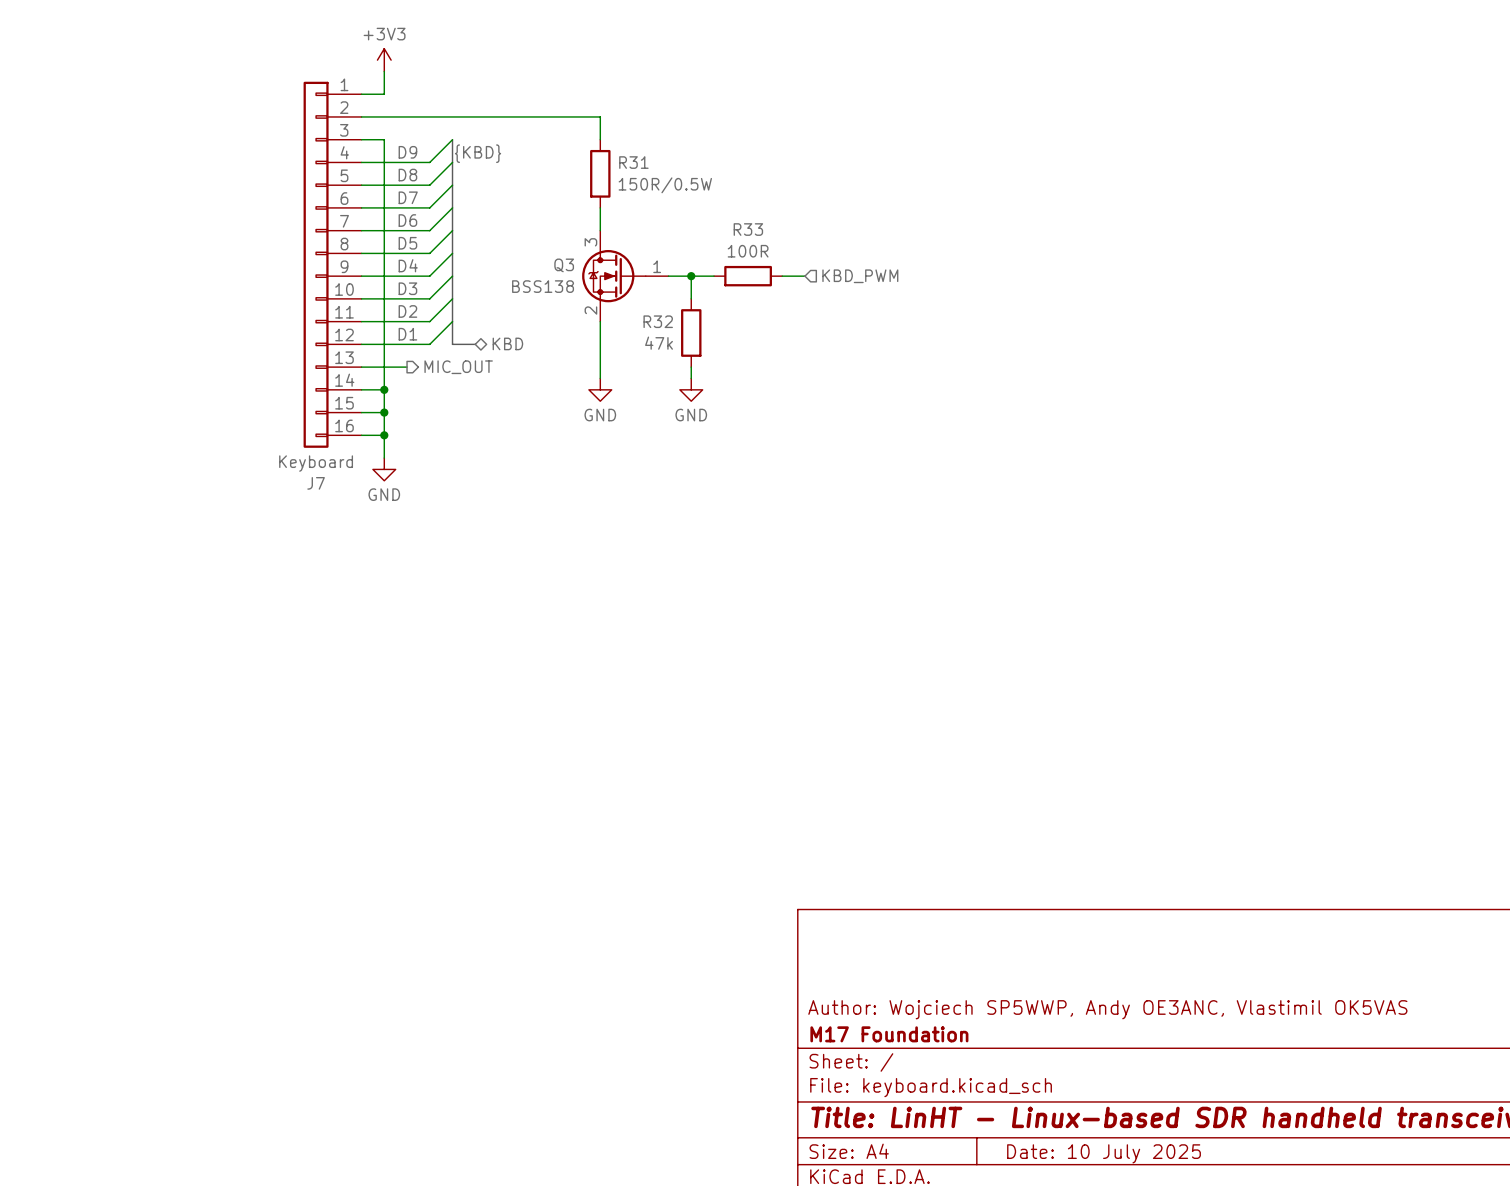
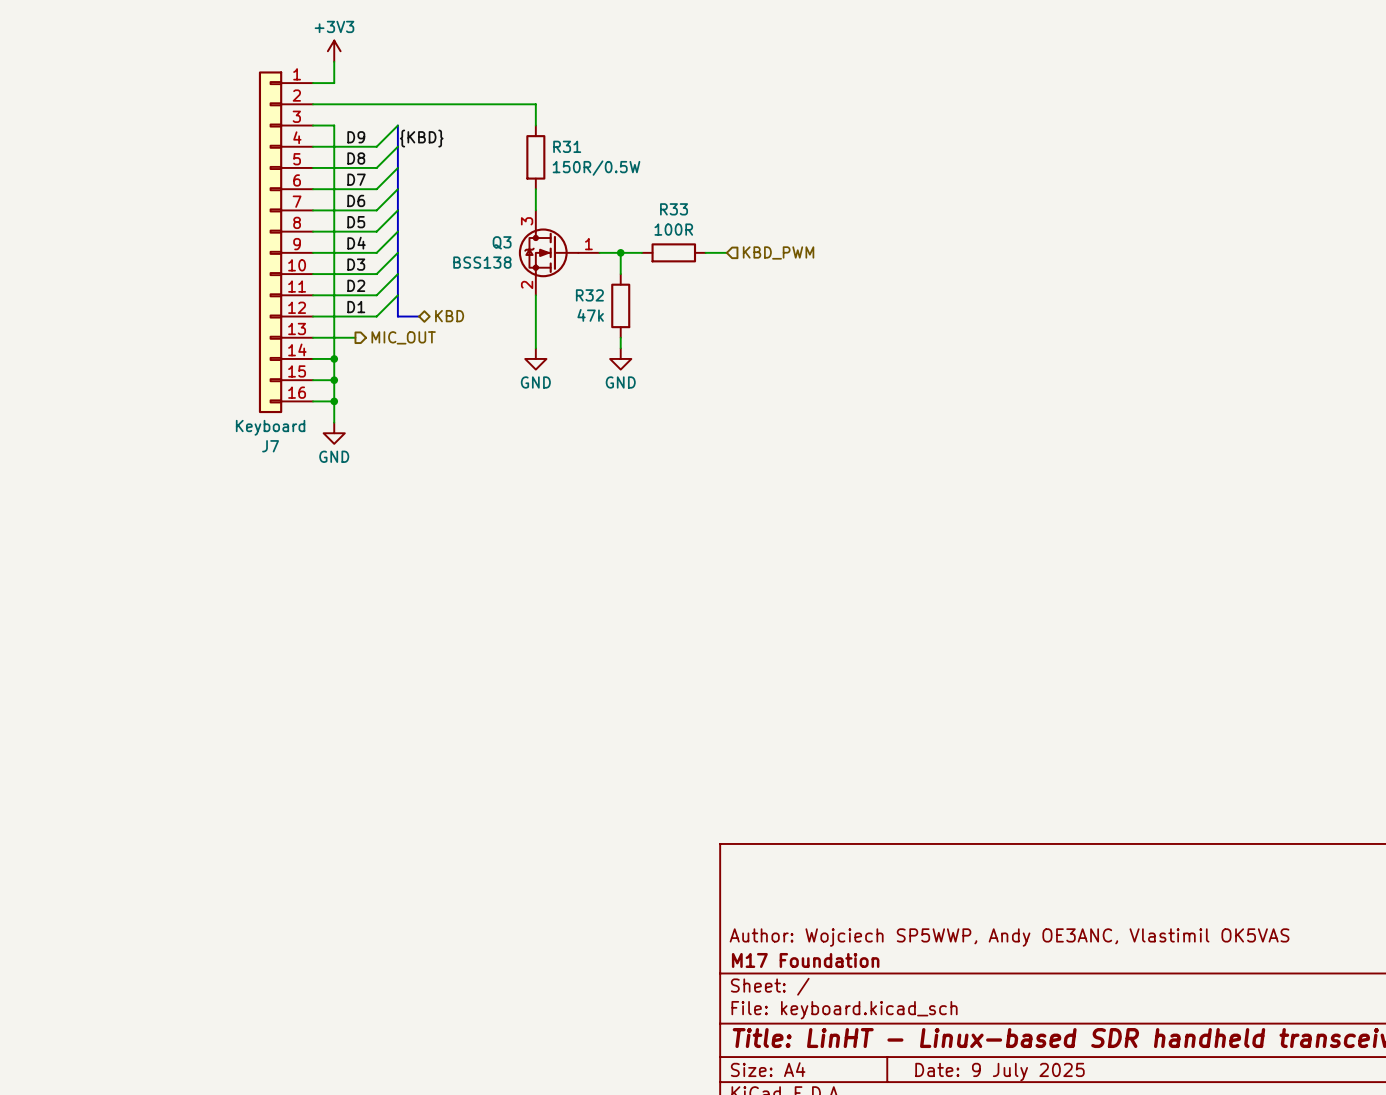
title block: Date: 10 July 2025 (1104, 1153) -> Date: 9 July 2025 (999, 1072)

